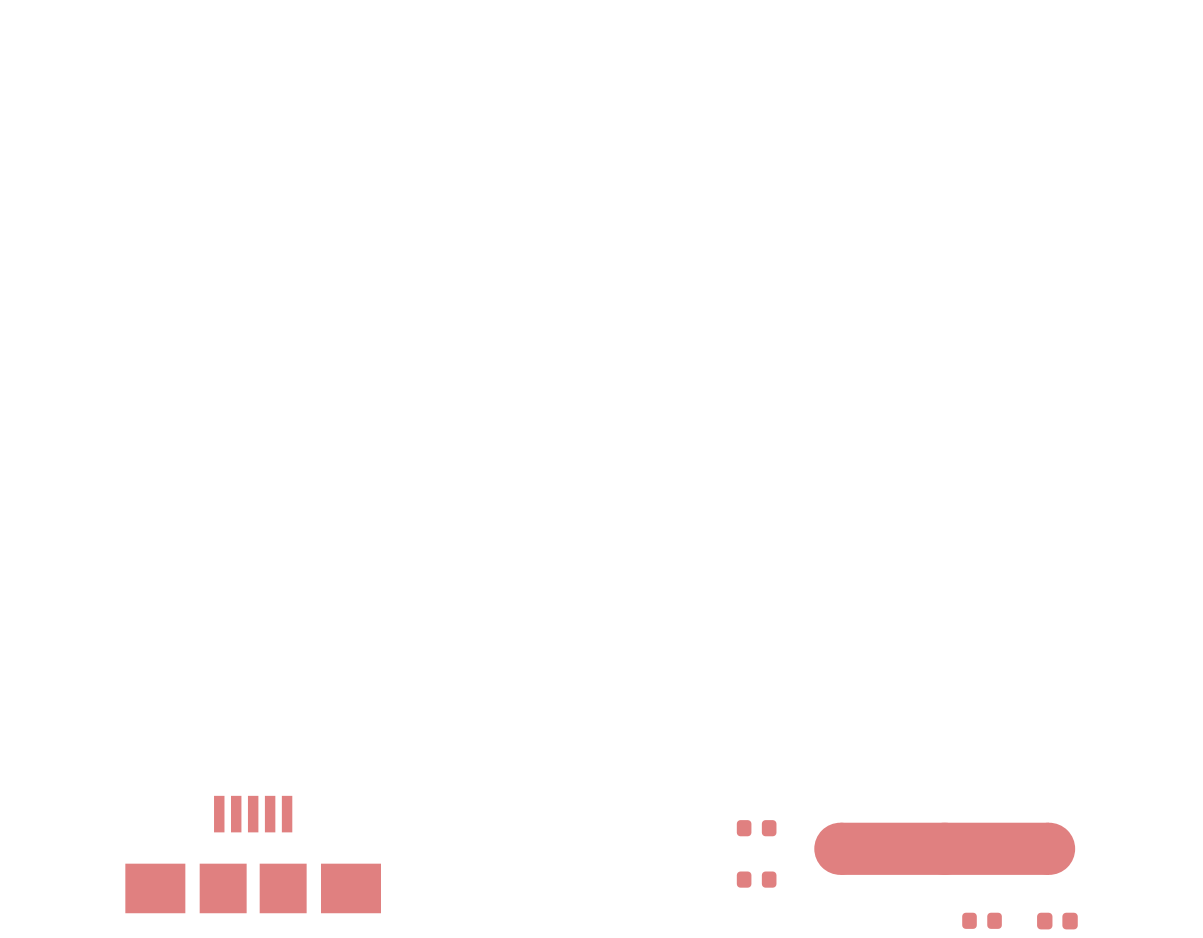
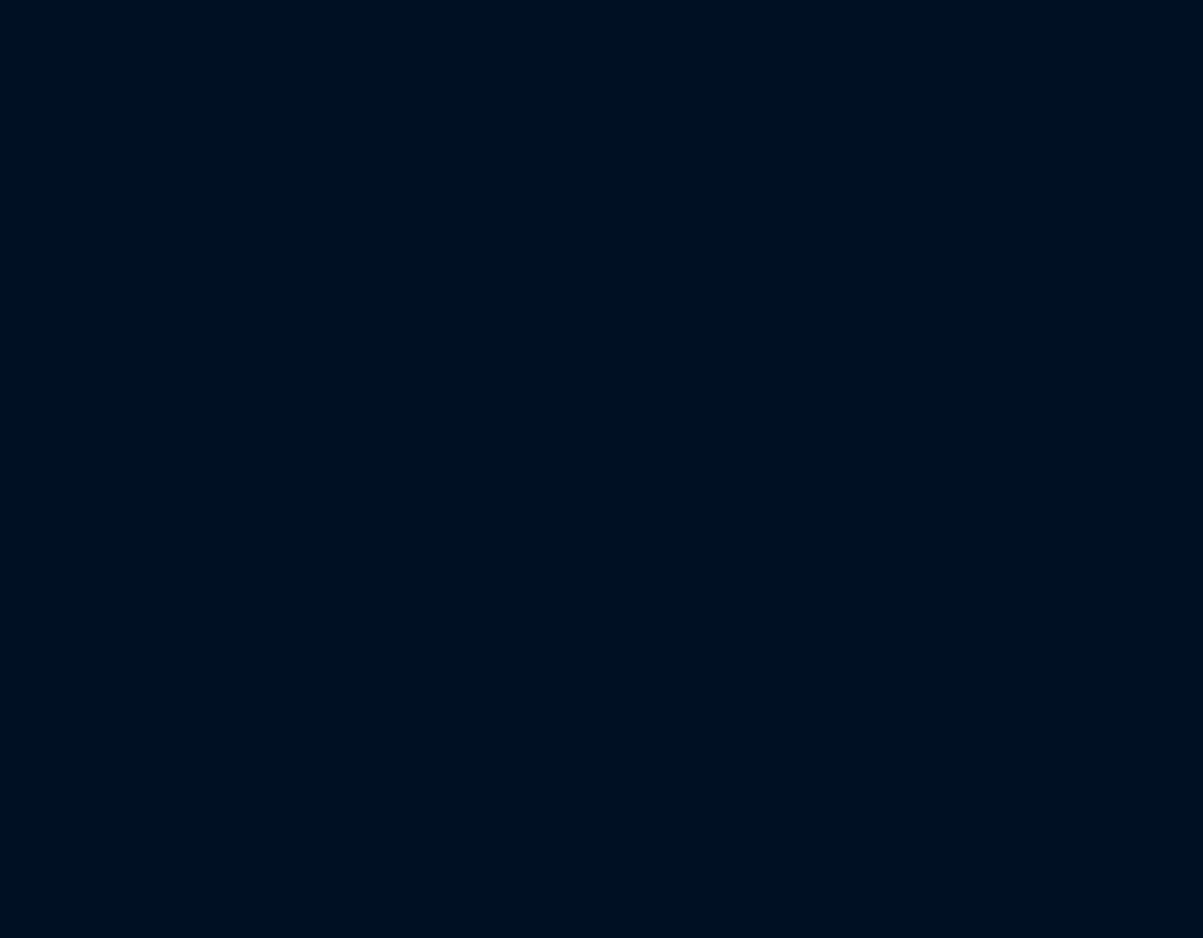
part: (756, 828) -> none
part: (944, 848) -> none
part: (253, 854) -> none
part: (756, 879) -> none
part: (982, 920) -> none
part: (1057, 921) -> none

